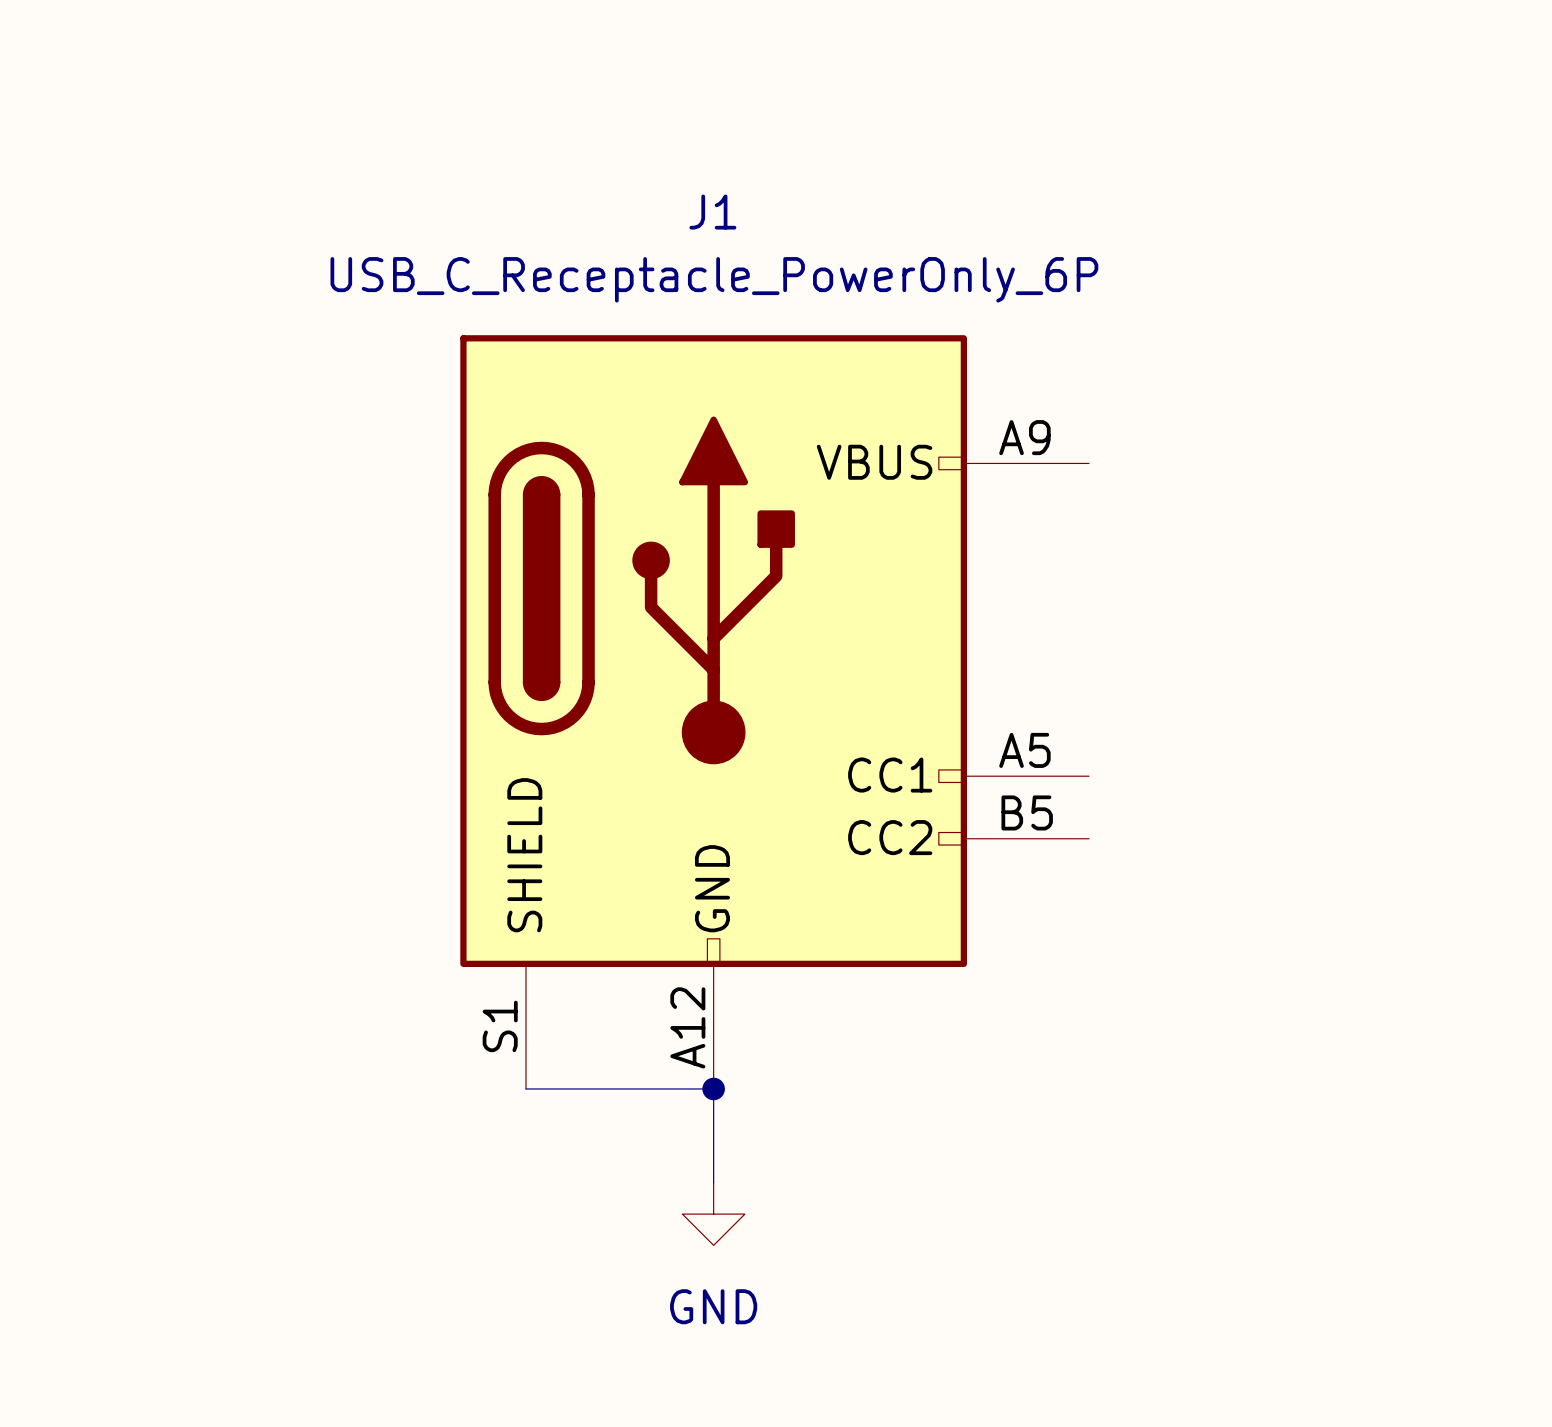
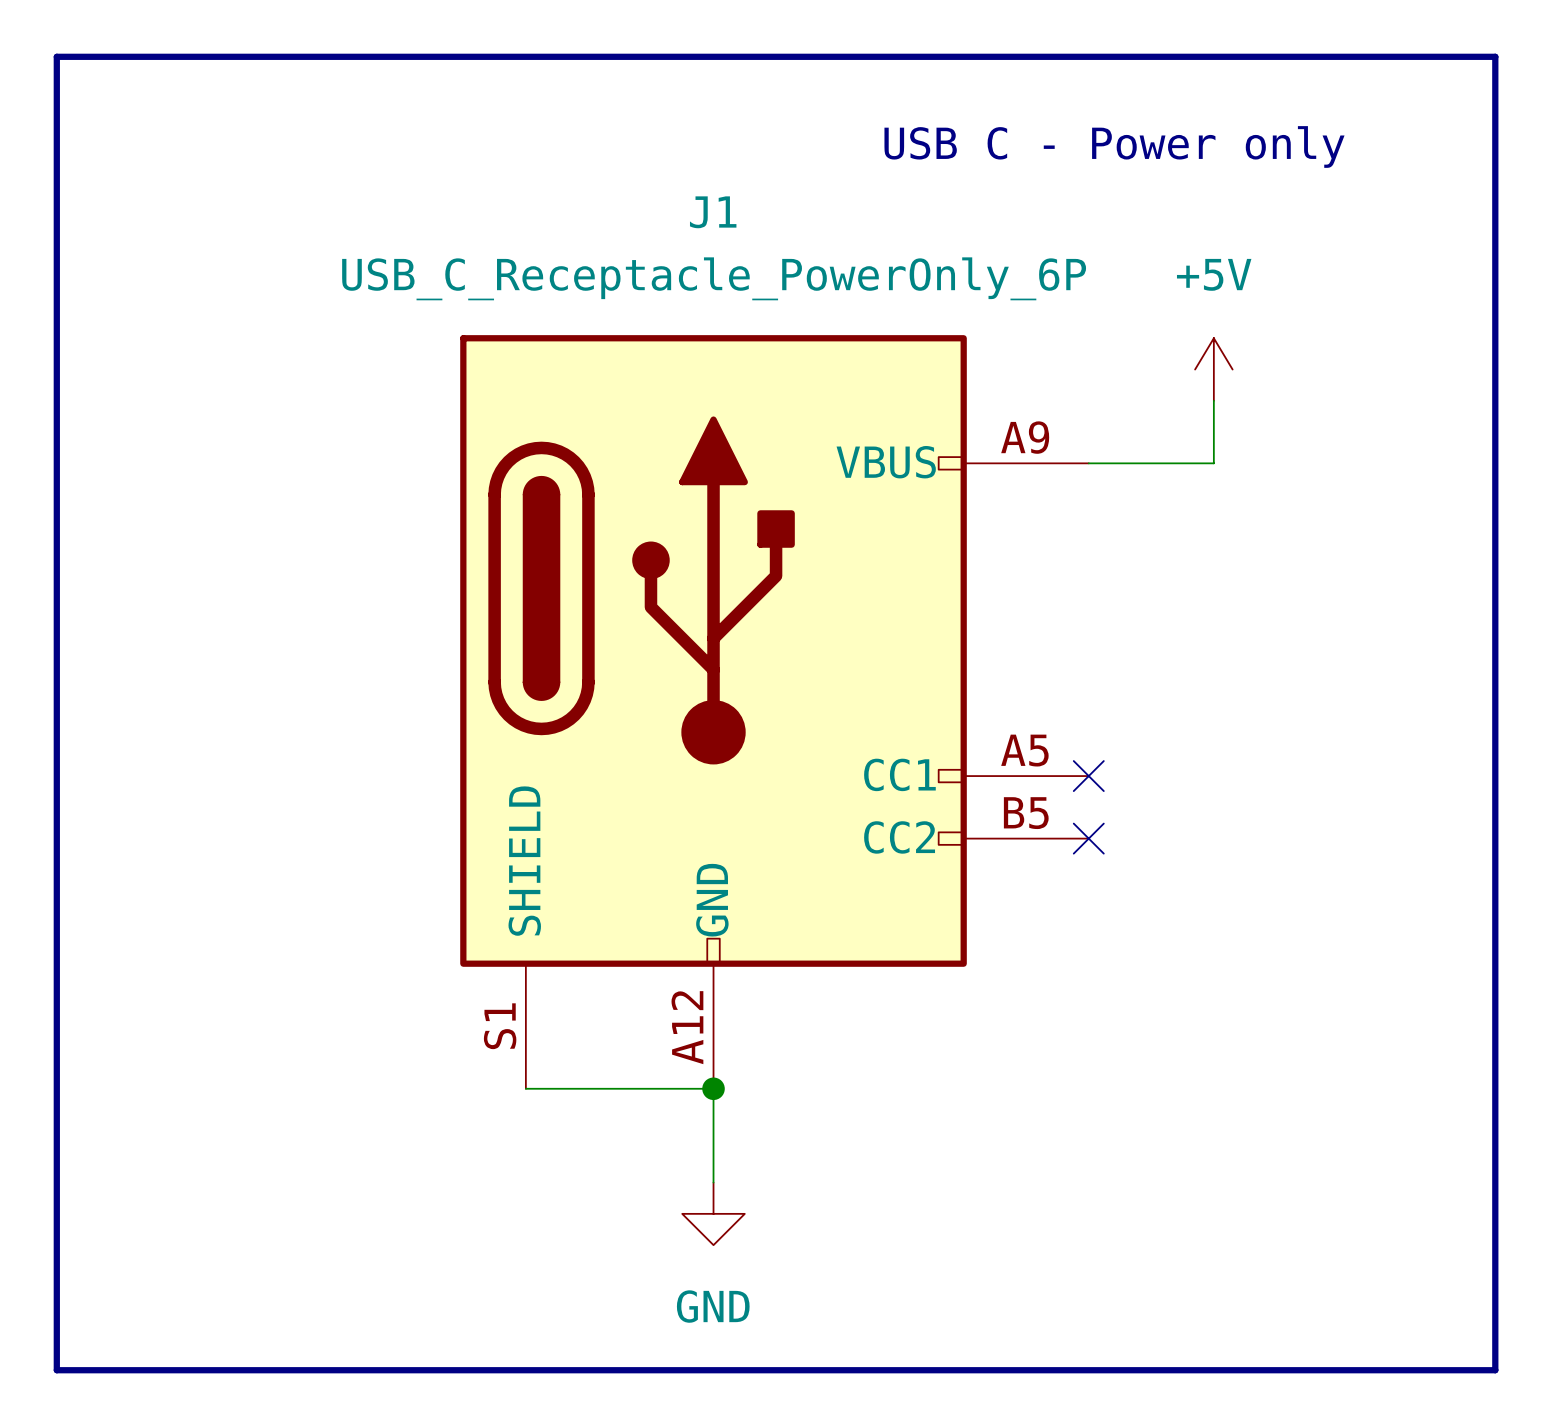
line: none -> (56, 56) (1495, 56) (1495, 1370) (56, 1370) (56, 56)
text: none -> USB C - Power only (1114, 146)
power symbol: none -> +5V (1213, 369)
wire: none -> (1213, 400) (1213, 463) (1088, 463)
no-connect mark: none -> (1088, 776)
no-connect mark: none -> (1088, 838)

